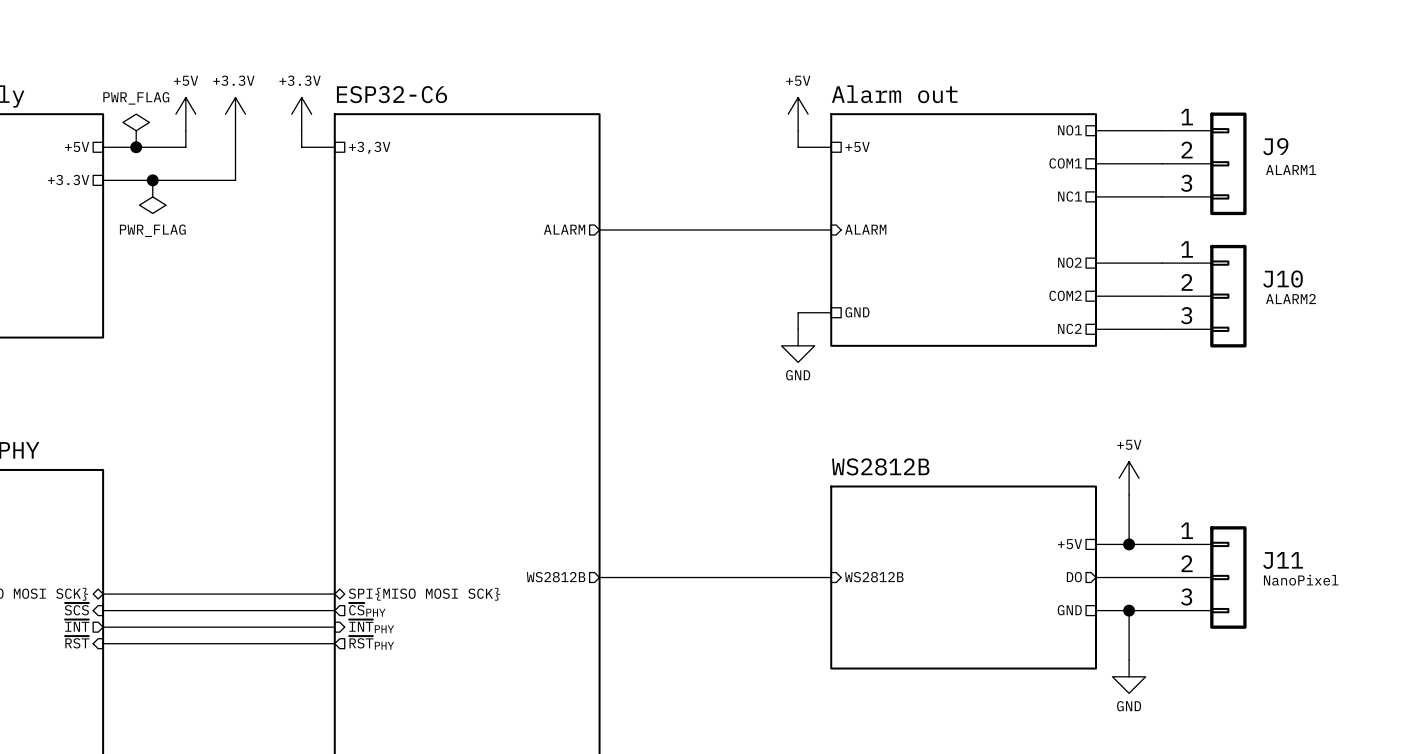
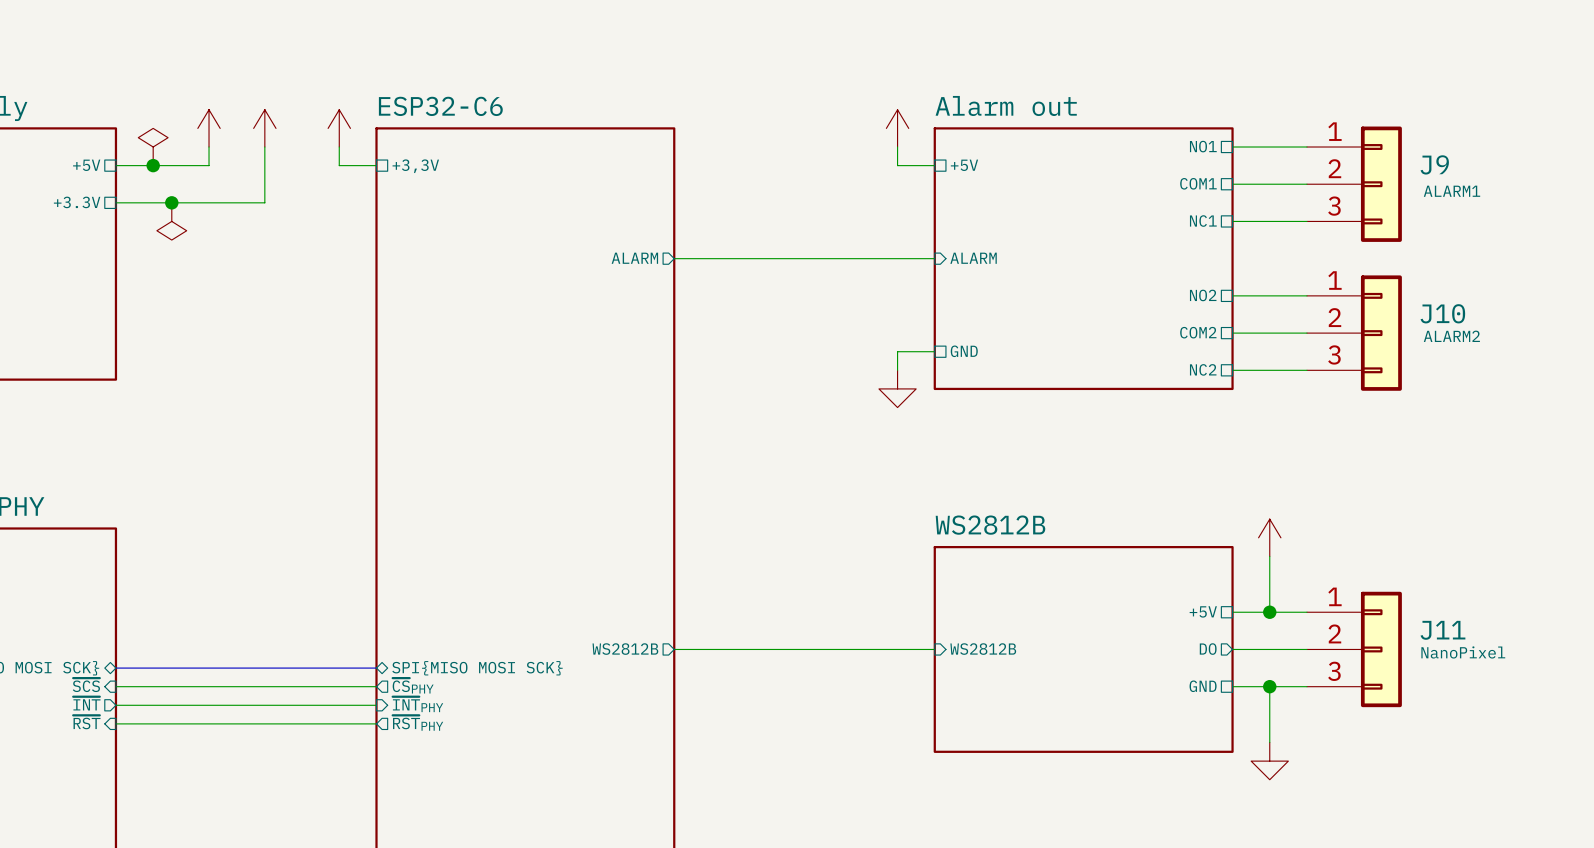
power symbol text: +5V (186, 80) -> none
power symbol text: +3.3V (233, 80) -> none
power symbol text: +3.3V (300, 80) -> none
power symbol text: +5V (798, 80) -> none
power symbol text: PWR_FLAG (136, 98) -> none
power symbol text: PWR_FLAG (152, 230) -> none
power symbol text: GND (798, 375) -> none
power symbol text: +5V (1129, 444) -> none
power symbol text: GND (1129, 706) -> none

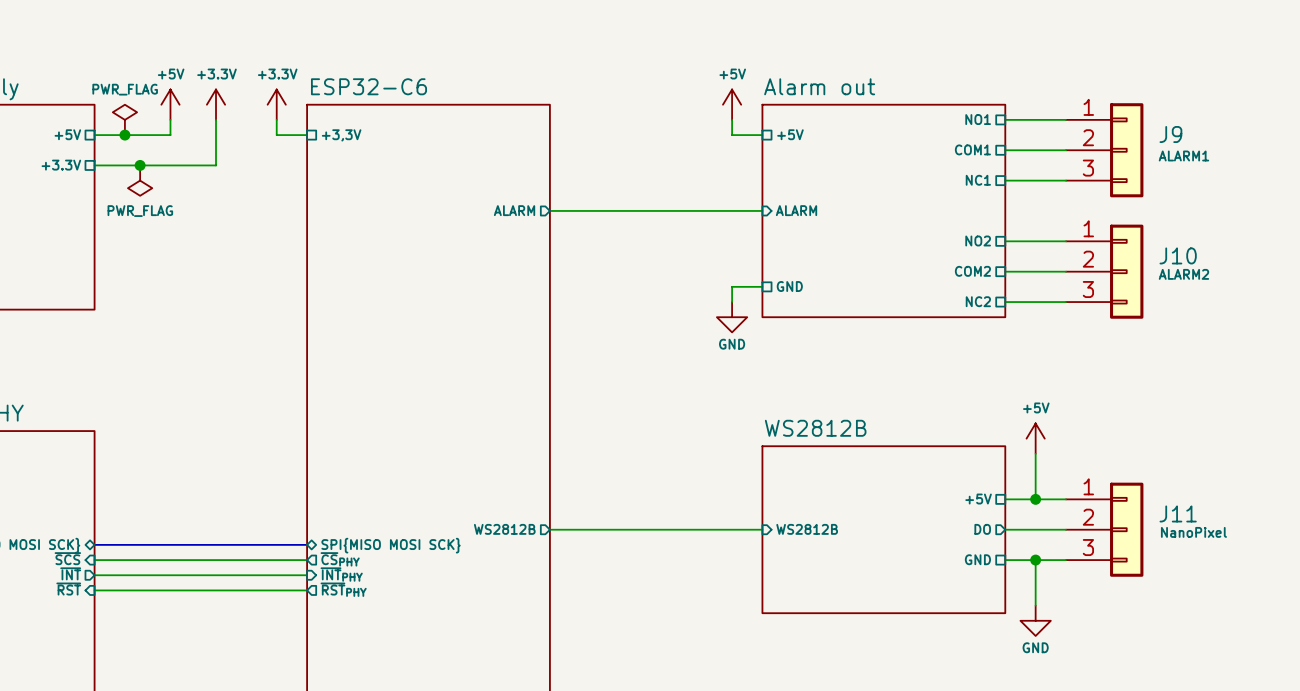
power symbol text: none -> +5V (171, 74)
power symbol text: none -> +3.3V (216, 74)
power symbol text: none -> +3.3V (277, 74)
power symbol text: none -> +5V (732, 74)
power symbol text: none -> PWR_FLAG (125, 89)
power symbol text: none -> PWR_FLAG (140, 211)
power symbol text: none -> GND (732, 344)
power symbol text: none -> +5V (1036, 407)
power symbol text: none -> GND (1035, 647)

